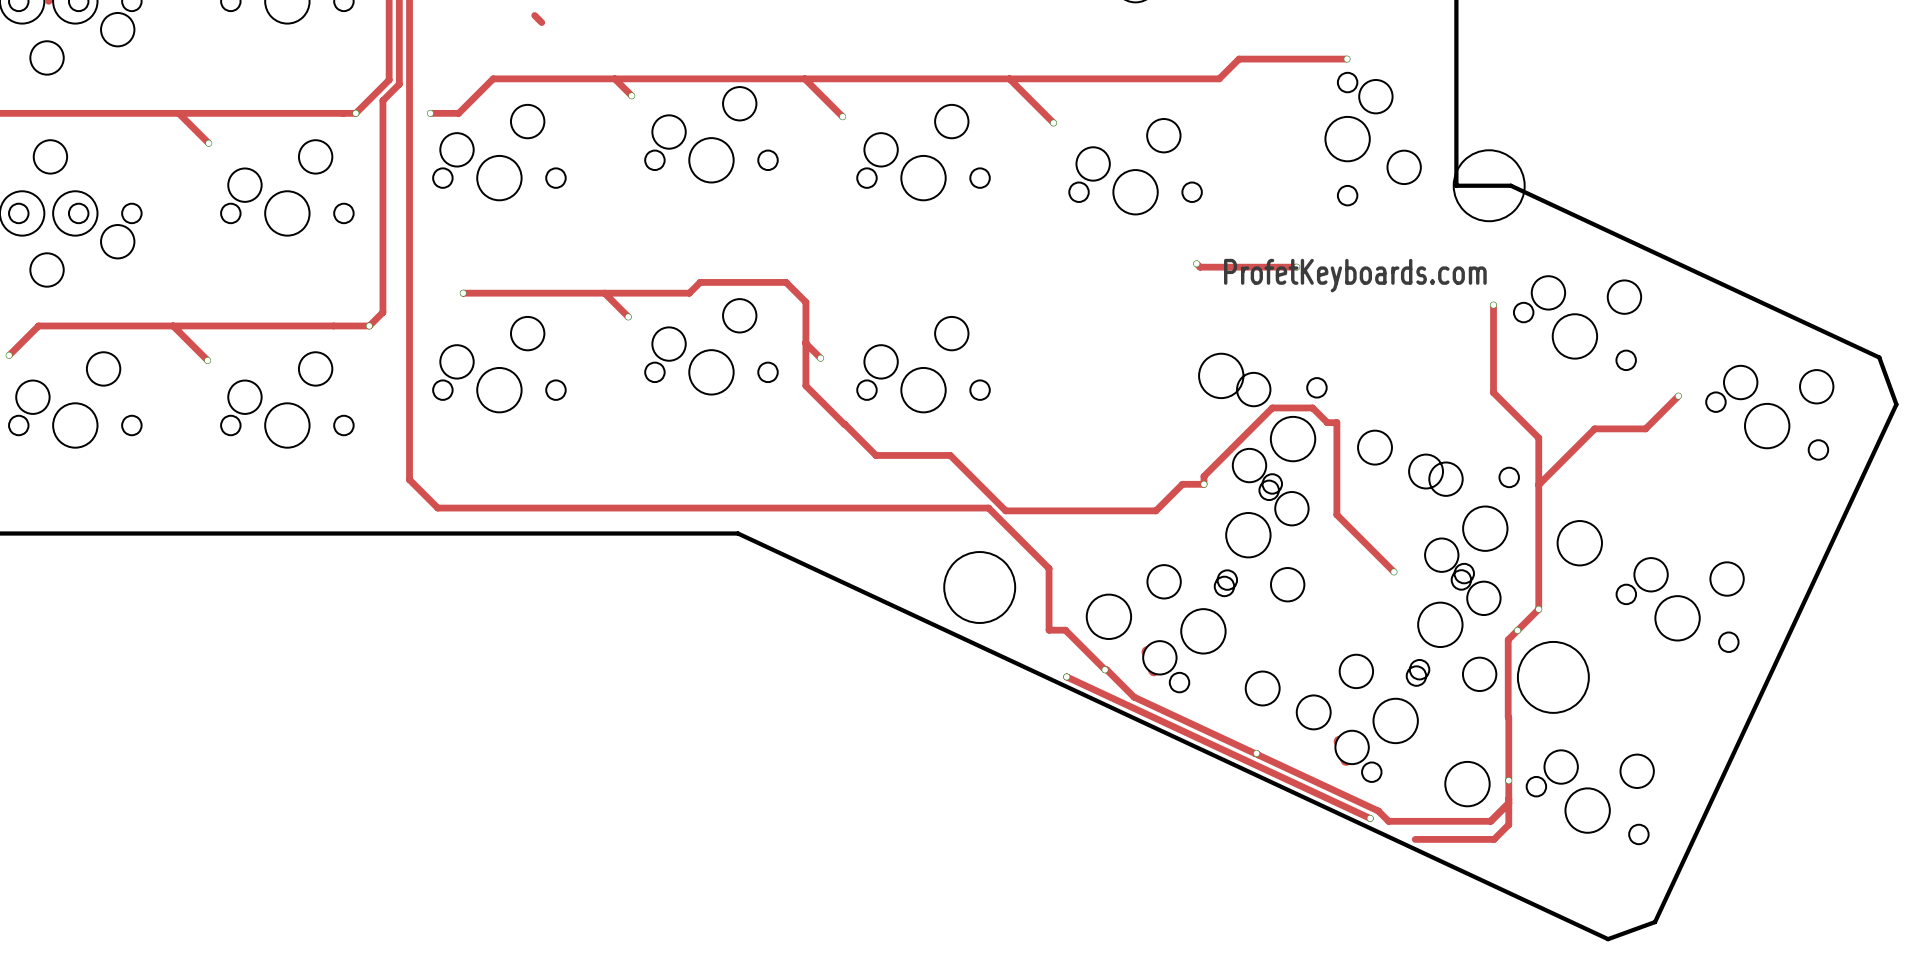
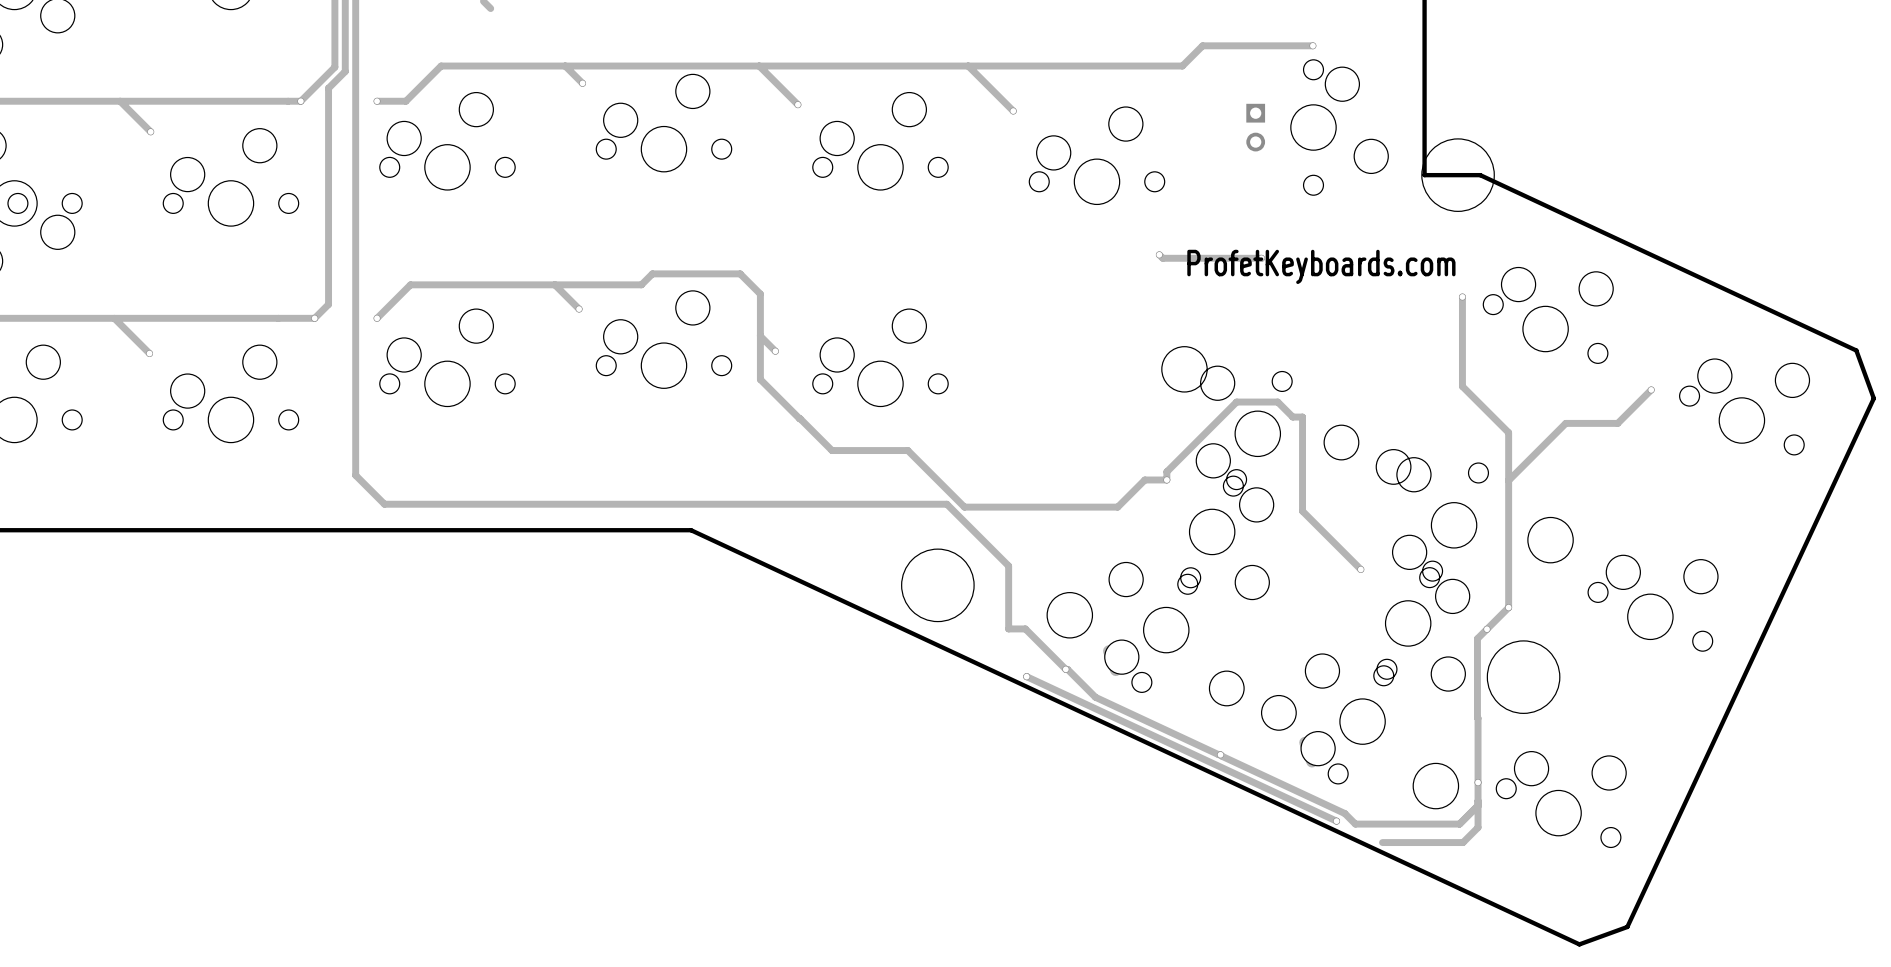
part: none -> (1255, 127)
track: none -> (410, 284) (377, 318)
via position: (463, 293) -> (377, 318)

